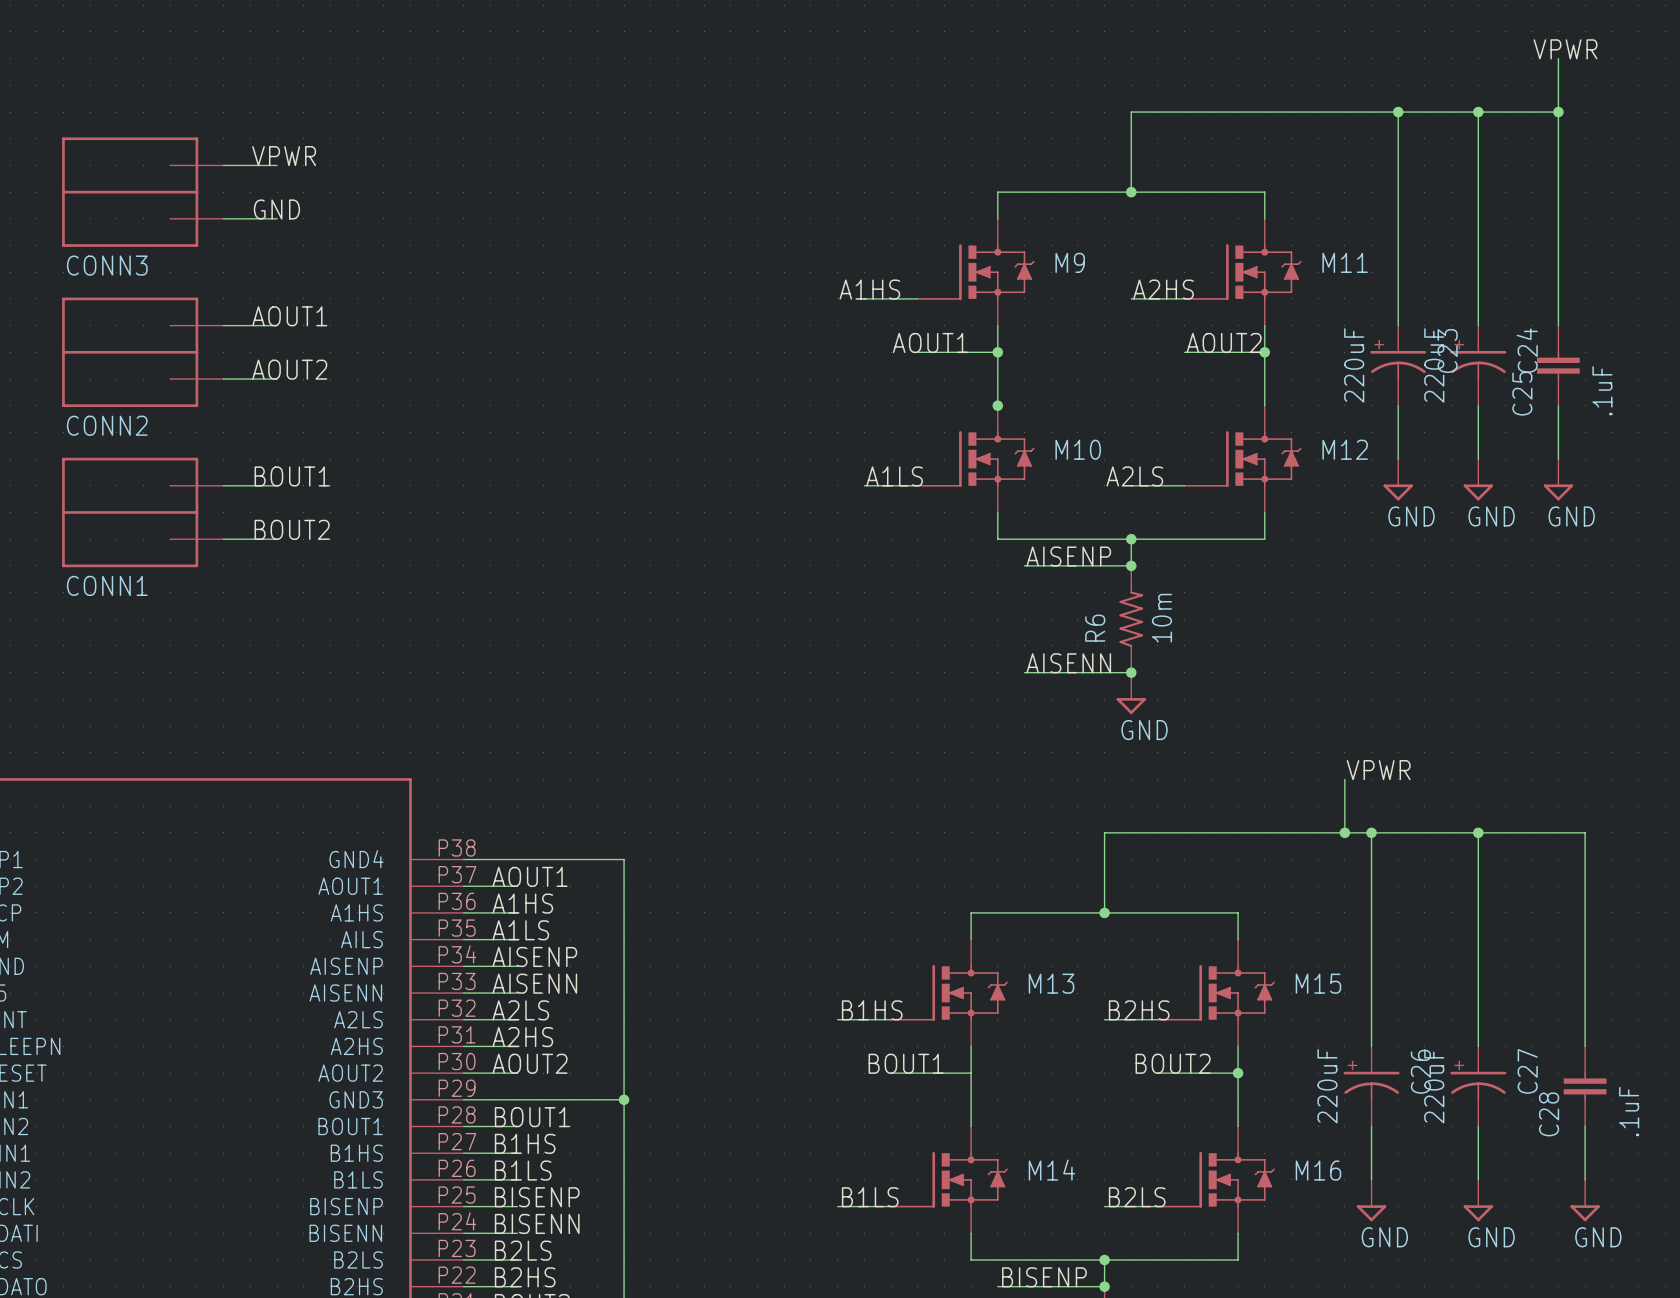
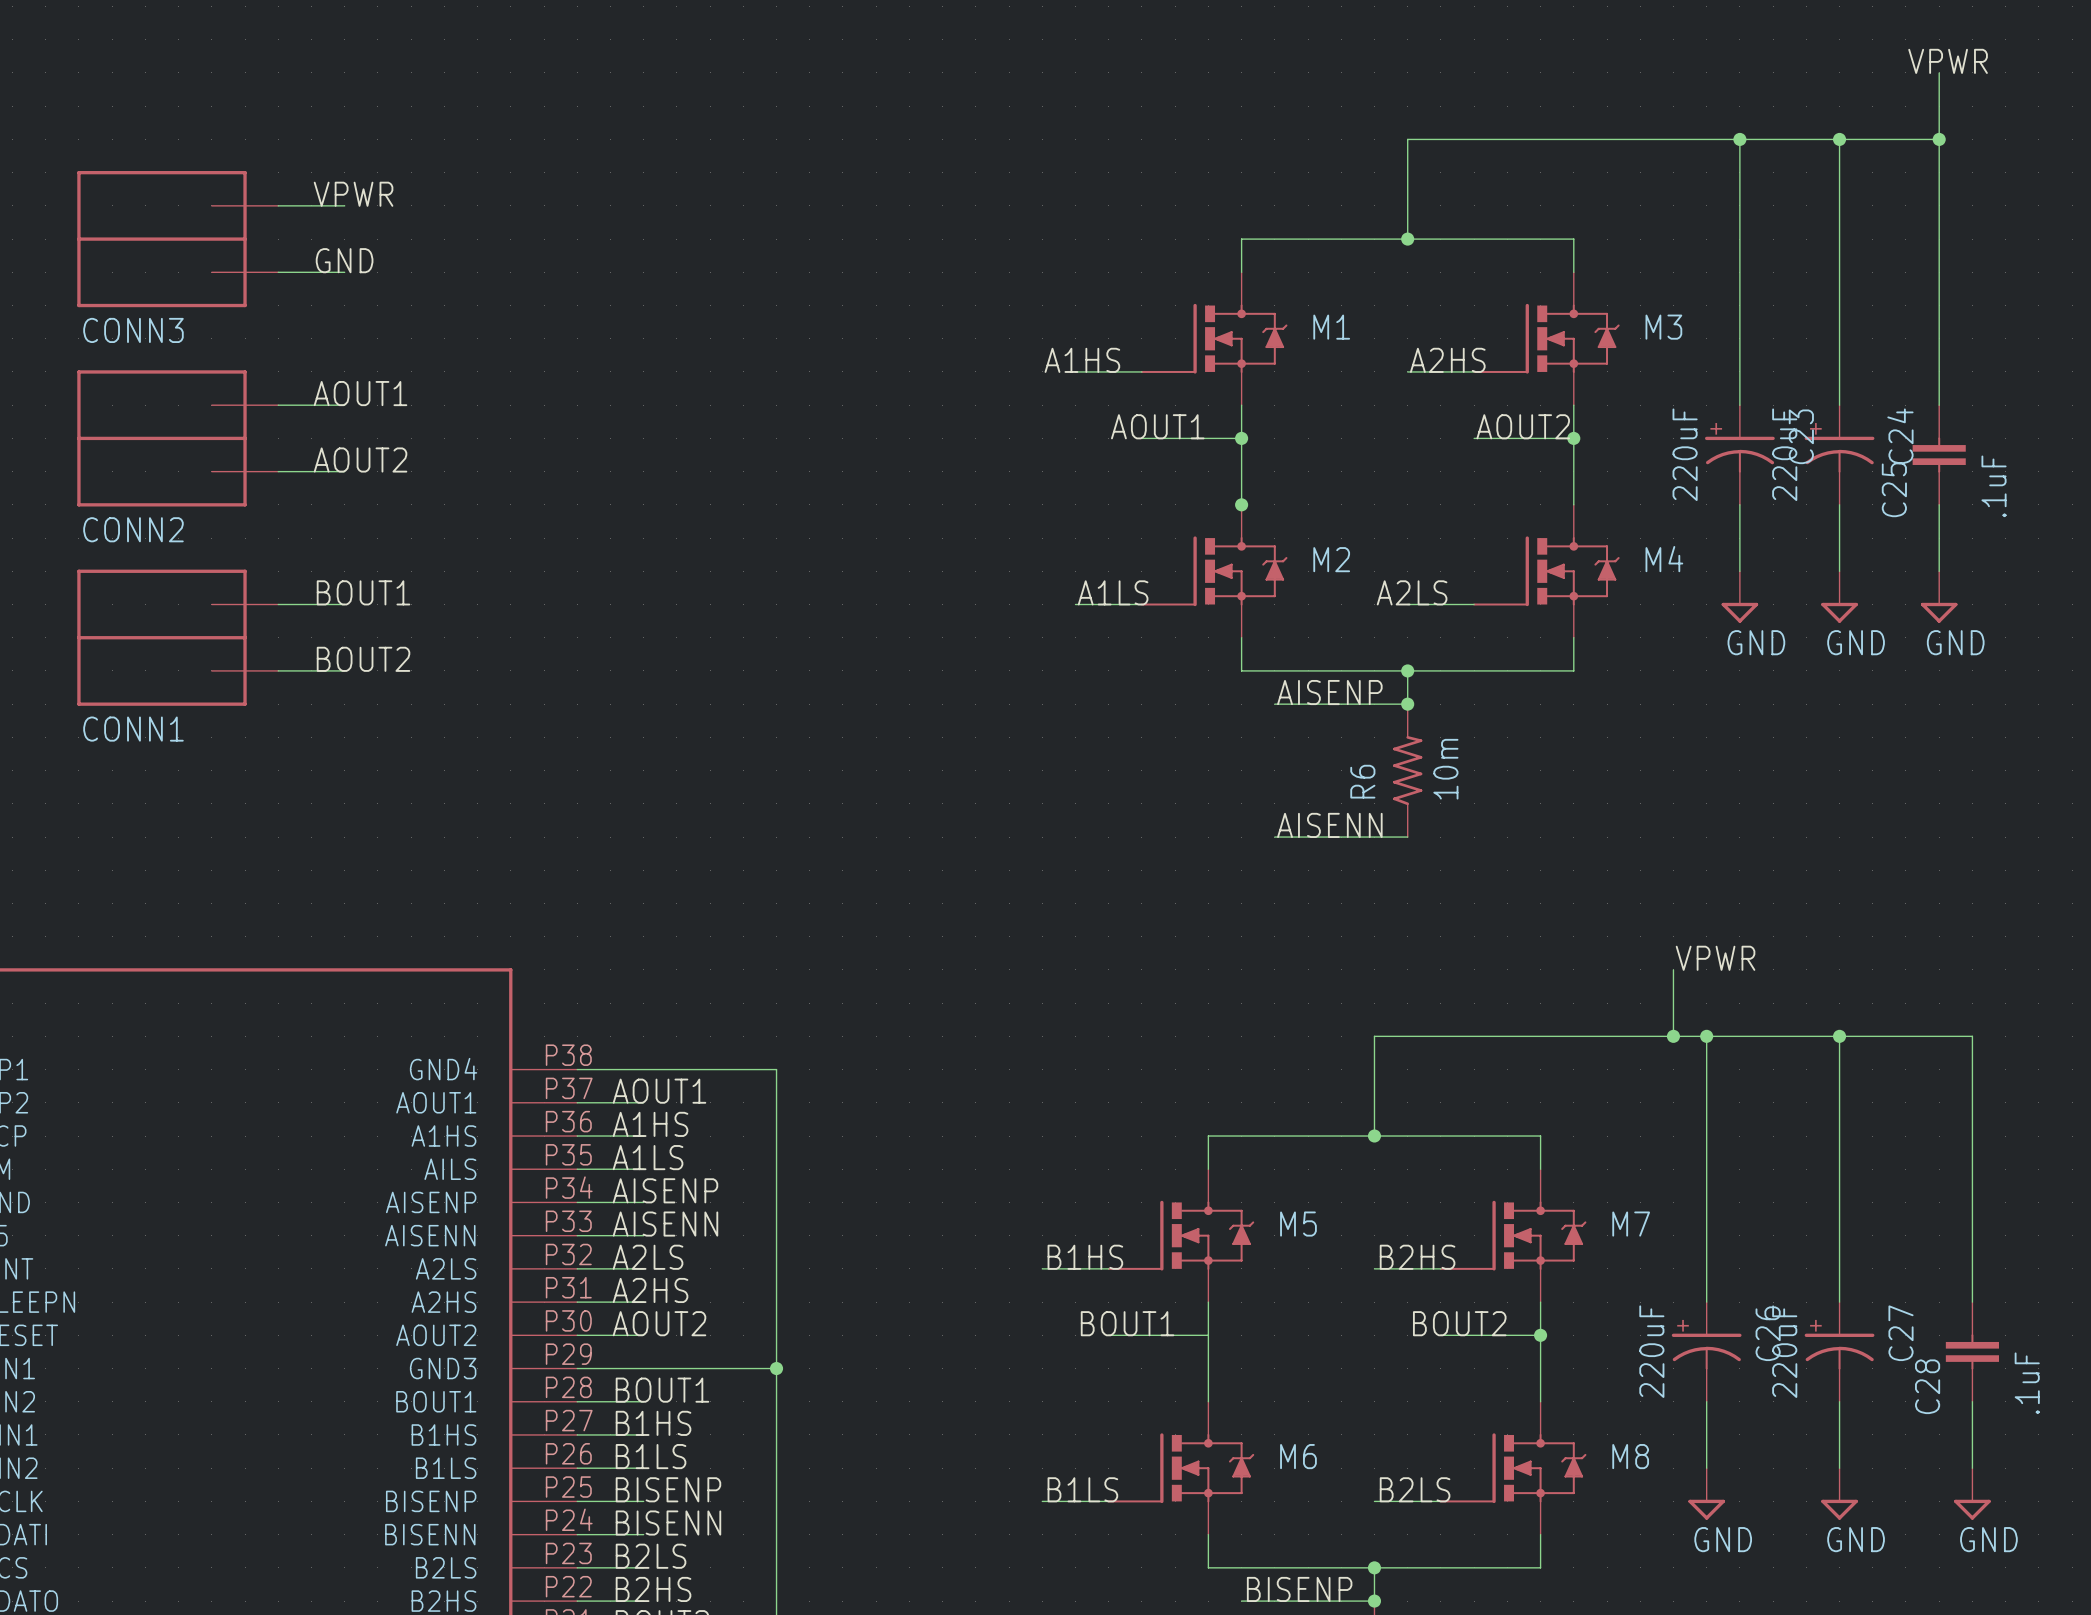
M9 name: M9 (1070, 262) -> M1 (1331, 327)
M11 name: M11 (1345, 262) -> M3 (1663, 327)
M10 name: M10 (1078, 449) -> M2 (1331, 559)
M12 name: M12 (1345, 449) -> M4 (1664, 559)
junction: (1131, 672) -> none
power symbol: GND (1131, 693) -> none
M13 name: M13 (1051, 983) -> M5 (1298, 1224)
M15 name: M15 (1318, 983) -> M7 (1631, 1224)
M14 name: M14 (1051, 1170) -> M6 (1298, 1456)
M16 name: M16 (1318, 1170) -> M8 (1630, 1456)

